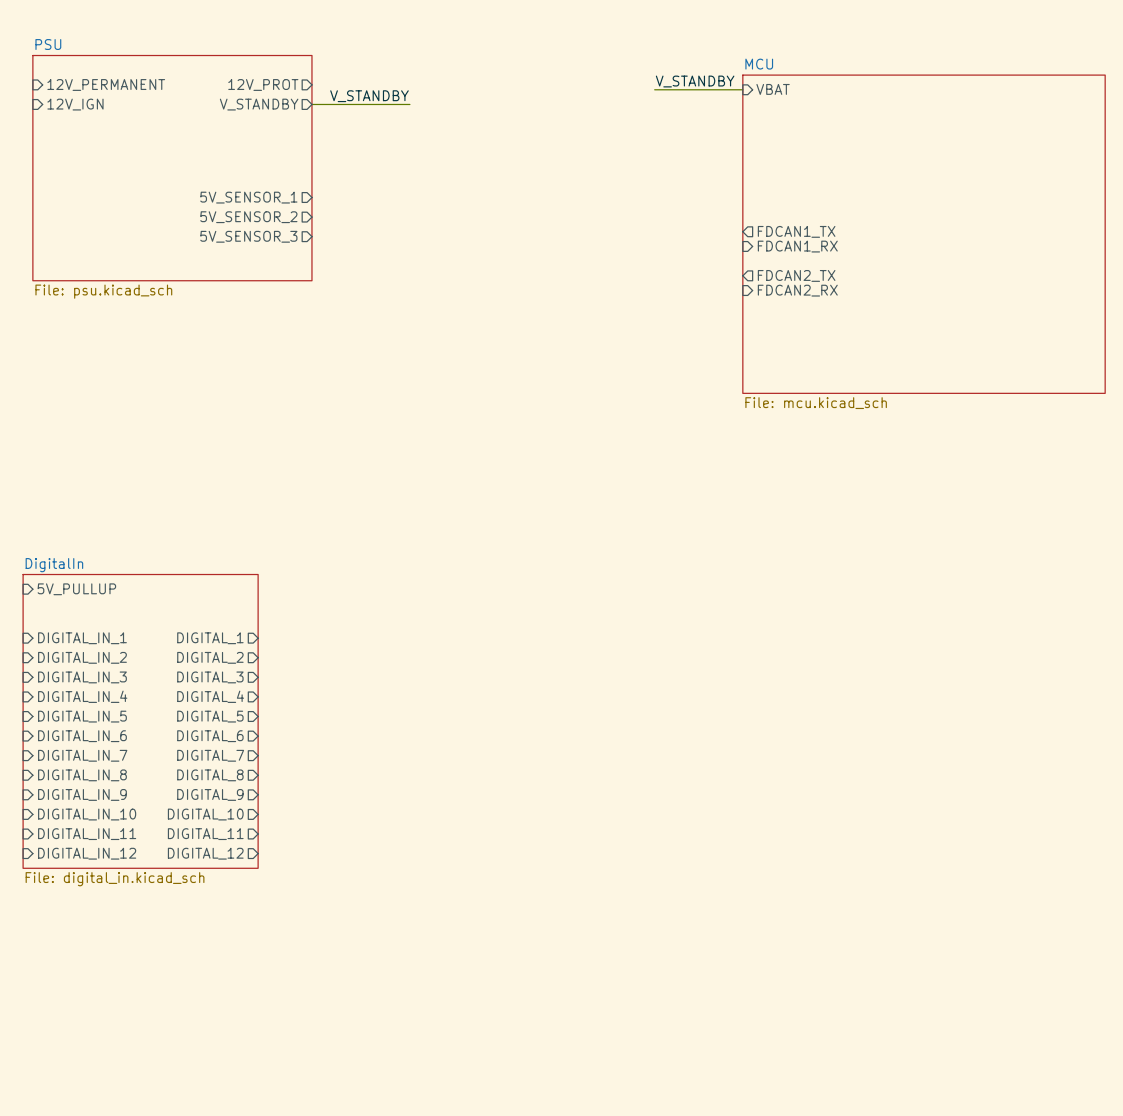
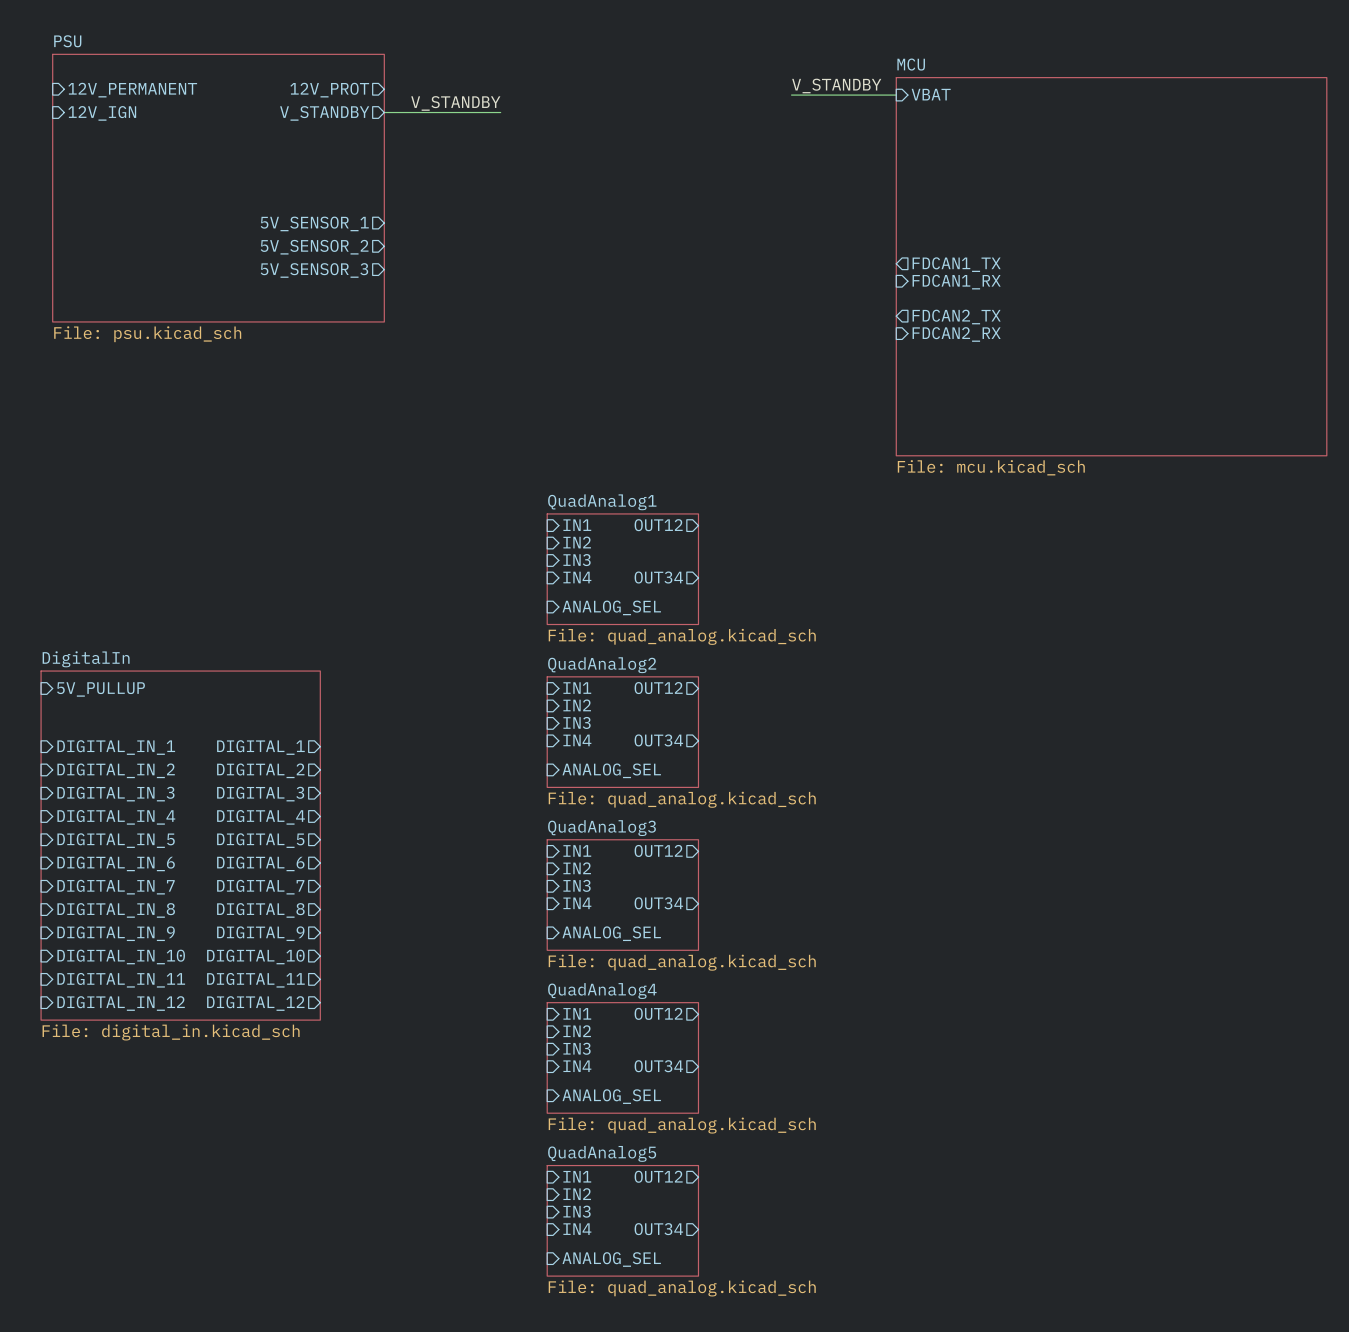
sheet pin: none -> IN1 (577, 525)
sheet pin: none -> OUT12 (658, 525)
sheet pin: none -> IN2 (577, 542)
sheet pin: none -> IN3 (577, 560)
sheet QuadAnalog1: none -> File: quad_analog.kicad_sch (622, 569)
sheet pin: none -> IN4 (577, 577)
sheet pin: none -> OUT34 (658, 577)
sheet pin: none -> ANALOG_SEL (611, 607)
sheet pin: none -> IN1 (577, 688)
sheet pin: none -> OUT12 (658, 688)
sheet pin: none -> IN2 (577, 705)
sheet pin: none -> IN3 (577, 722)
sheet QuadAnalog2: none -> File: quad_analog.kicad_sch (622, 732)
sheet pin: none -> IN4 (577, 740)
sheet pin: none -> OUT34 (658, 740)
sheet pin: none -> ANALOG_SEL (611, 770)
sheet pin: none -> IN1 (577, 850)
sheet pin: none -> OUT12 (658, 850)
sheet pin: none -> IN2 (577, 868)
sheet pin: none -> IN3 (577, 885)
sheet QuadAnalog3: none -> File: quad_analog.kicad_sch (622, 895)
sheet pin: none -> IN4 (577, 903)
sheet pin: none -> OUT34 (658, 903)
sheet pin: none -> ANALOG_SEL (611, 933)
sheet pin: none -> IN1 (577, 1013)
sheet pin: none -> OUT12 (658, 1013)
sheet pin: none -> IN2 (577, 1031)
sheet pin: none -> IN3 (577, 1048)
sheet QuadAnalog4: none -> File: quad_analog.kicad_sch (622, 1057)
sheet pin: none -> IN4 (577, 1066)
sheet pin: none -> OUT34 (658, 1066)
sheet pin: none -> ANALOG_SEL (611, 1096)
sheet pin: none -> IN1 (577, 1176)
sheet pin: none -> OUT12 (658, 1176)
sheet pin: none -> IN2 (577, 1194)
sheet pin: none -> IN3 (577, 1211)
sheet QuadAnalog5: none -> File: quad_analog.kicad_sch (622, 1220)
sheet pin: none -> IN4 (577, 1229)
sheet pin: none -> OUT34 (658, 1229)
sheet pin: none -> ANALOG_SEL (611, 1259)

